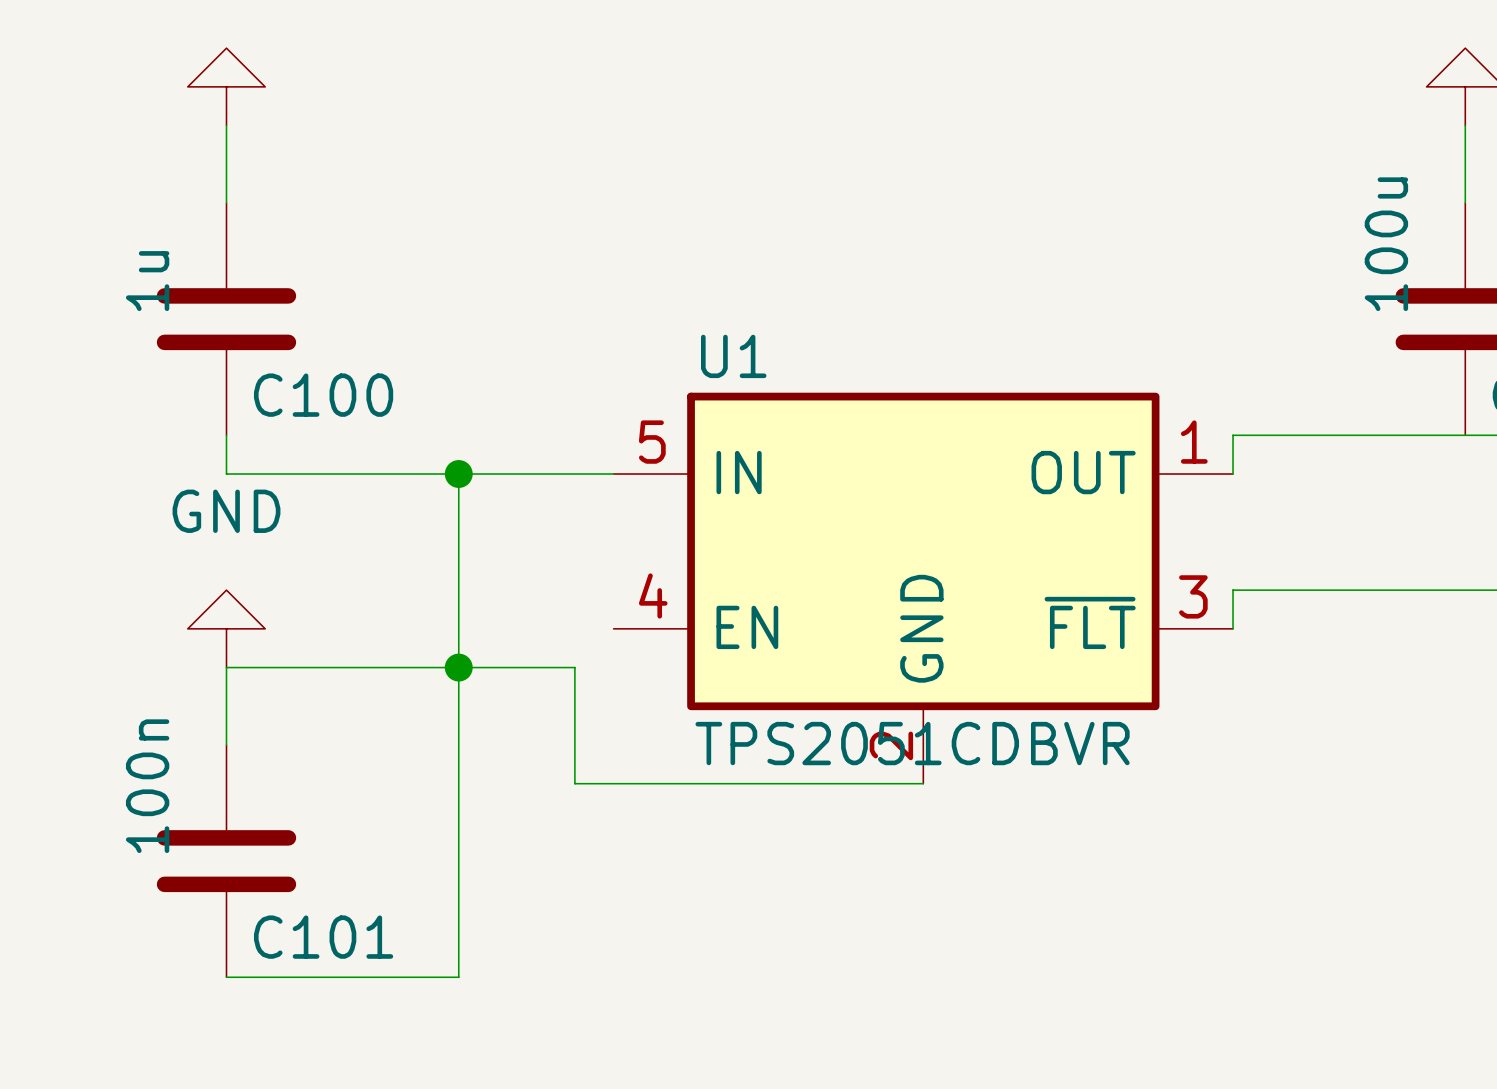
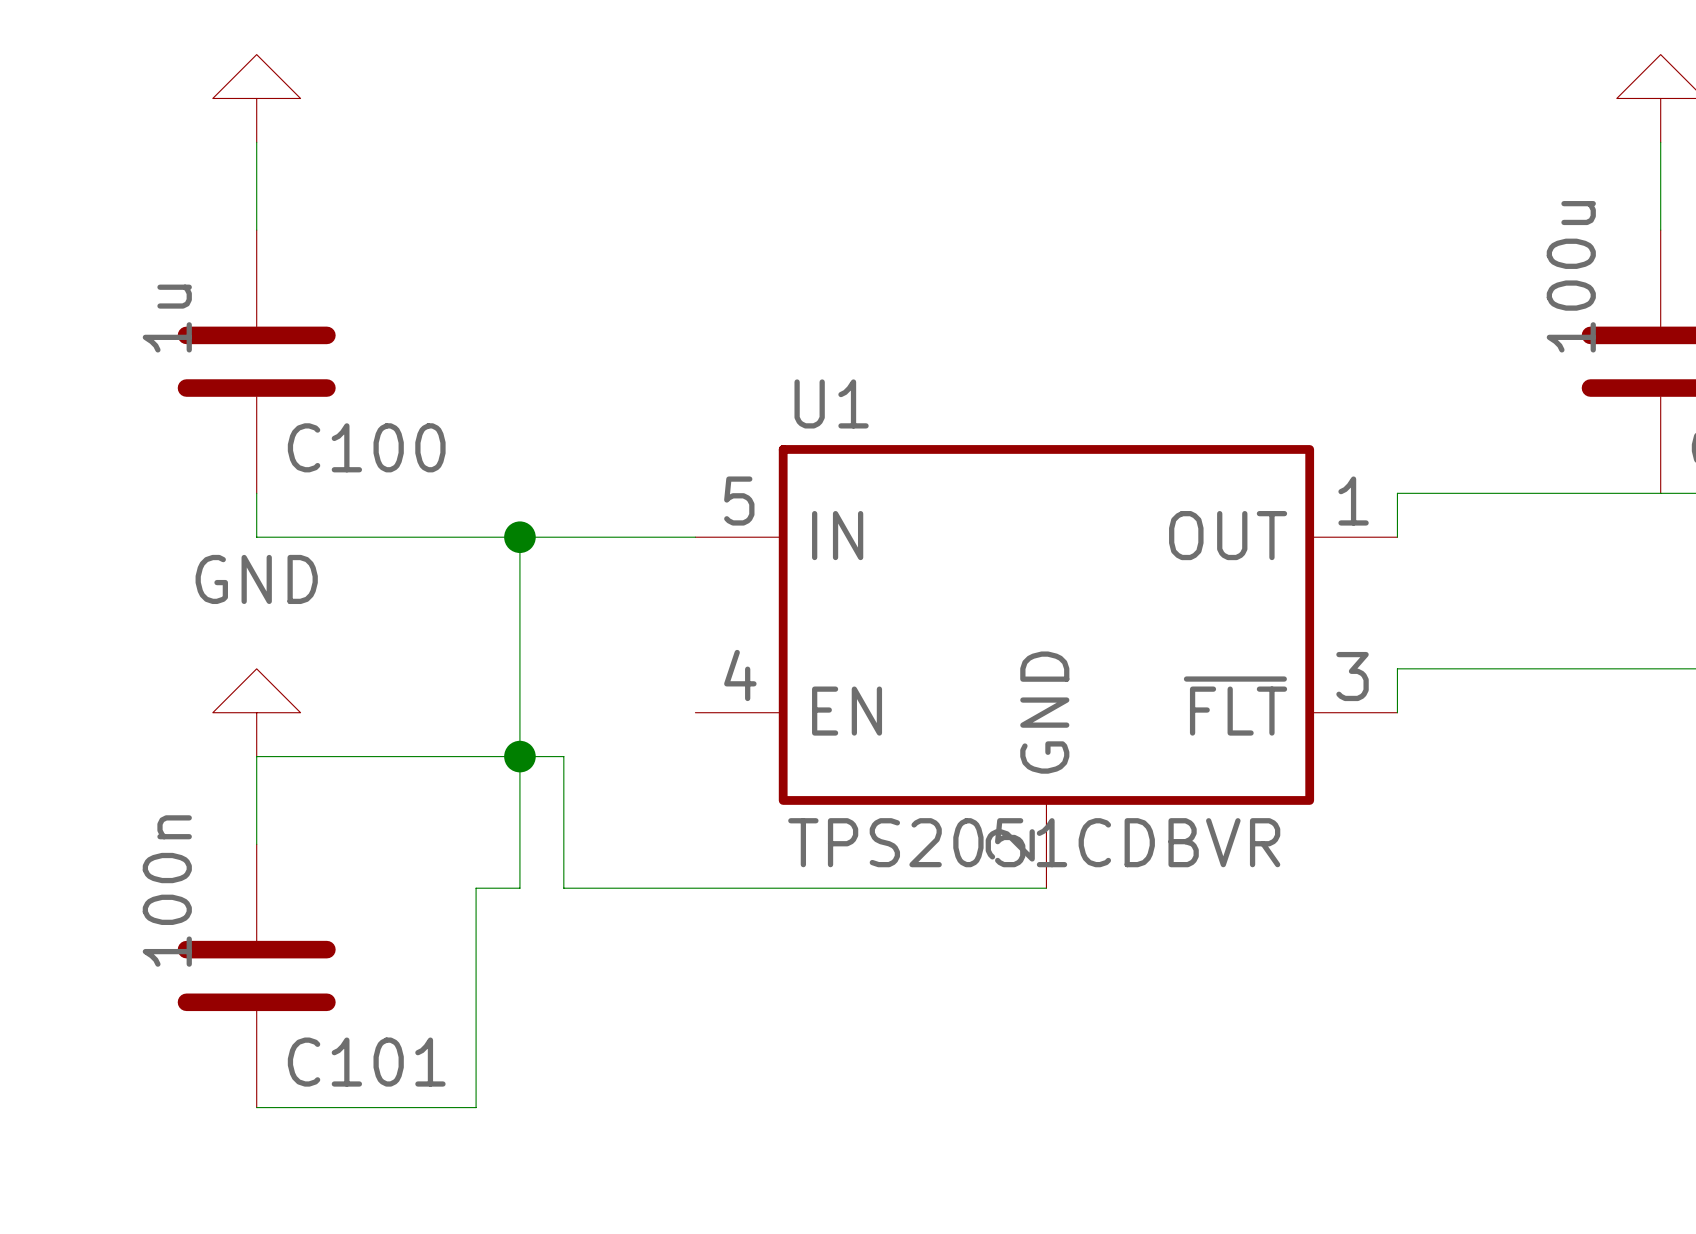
wire: (497, 667) (574, 667) (574, 783) -> (563, 756) (563, 888) (651, 888)
wire: (458, 783) (458, 977) (420, 977) -> (519, 888) (476, 888) (476, 1107)

